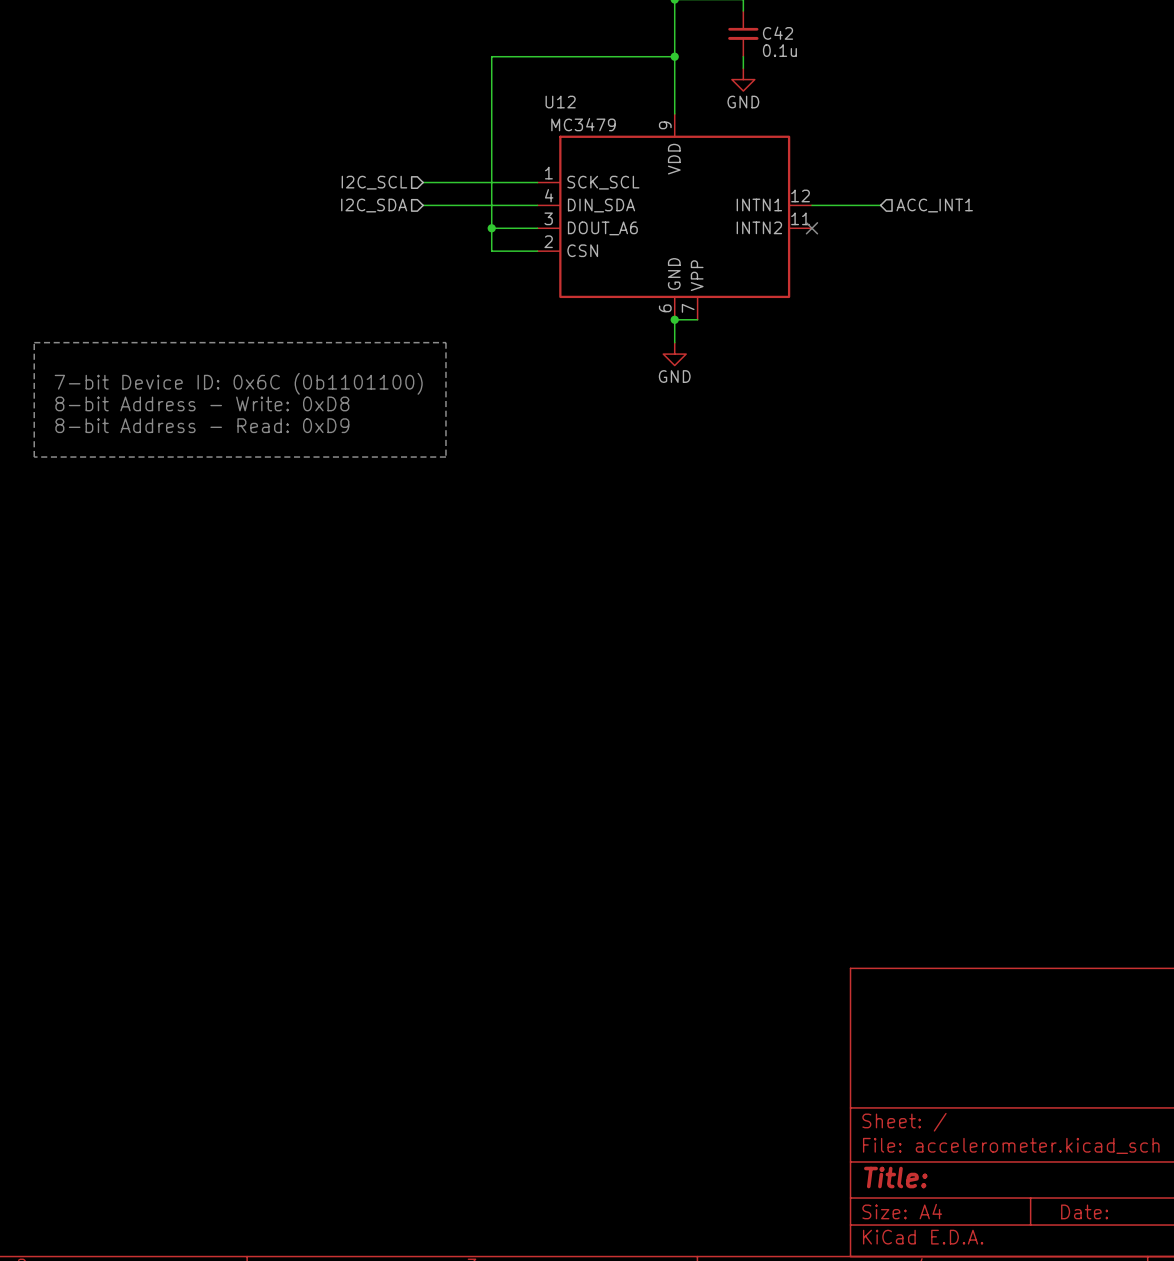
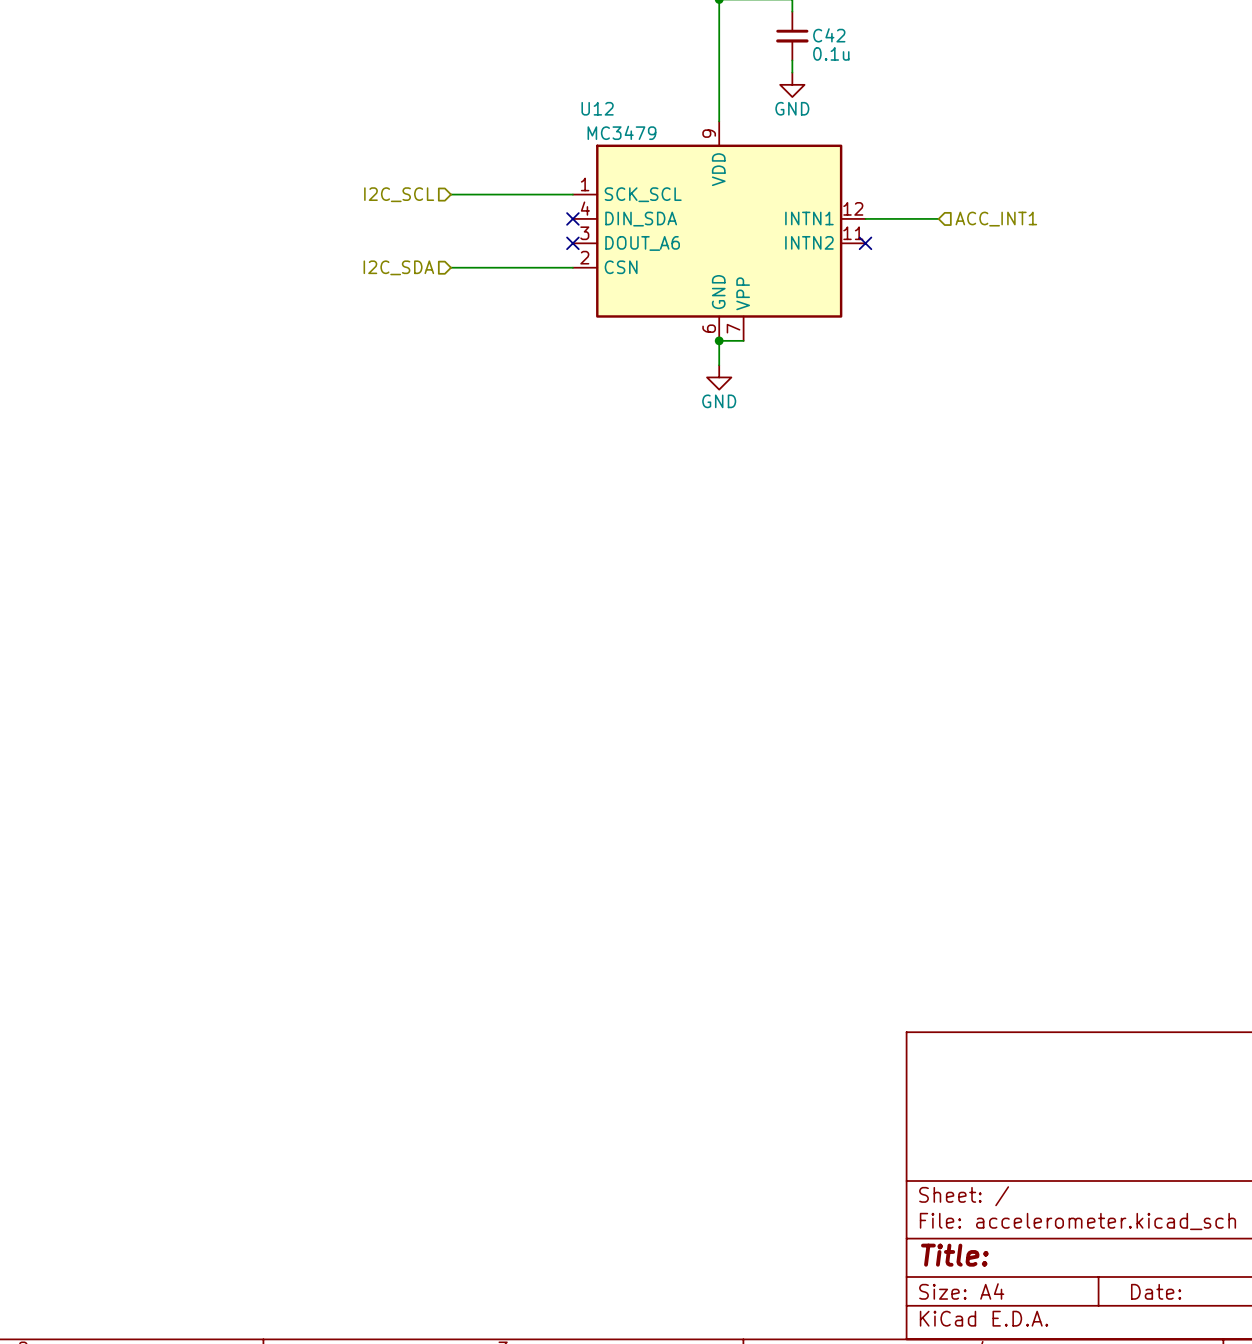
wire: (674, 56) (491, 56) (491, 251) -> (451, 267) (524, 267)
junction: (674, 56) -> none
hierarchical label position: I2C_SDA (374, 205) -> I2C_SDA (398, 267)
wire: (423, 205) (537, 205) -> none
no-connect mark: none -> (572, 218)
wire: (491, 228) (537, 228) -> none
junction: (491, 228) -> none
no-connect mark: none -> (572, 243)
line: (34, 342) (445, 342) (445, 457) (34, 457) (34, 342) -> none
text: 7-bit Device ID: 0x6C (0b1101100) (238, 383) -> none
text: 8-bit Address - Write: 0xD8 (202, 403) -> none
text: 8-bit Address - Read: 0xD9 (202, 425) -> none

